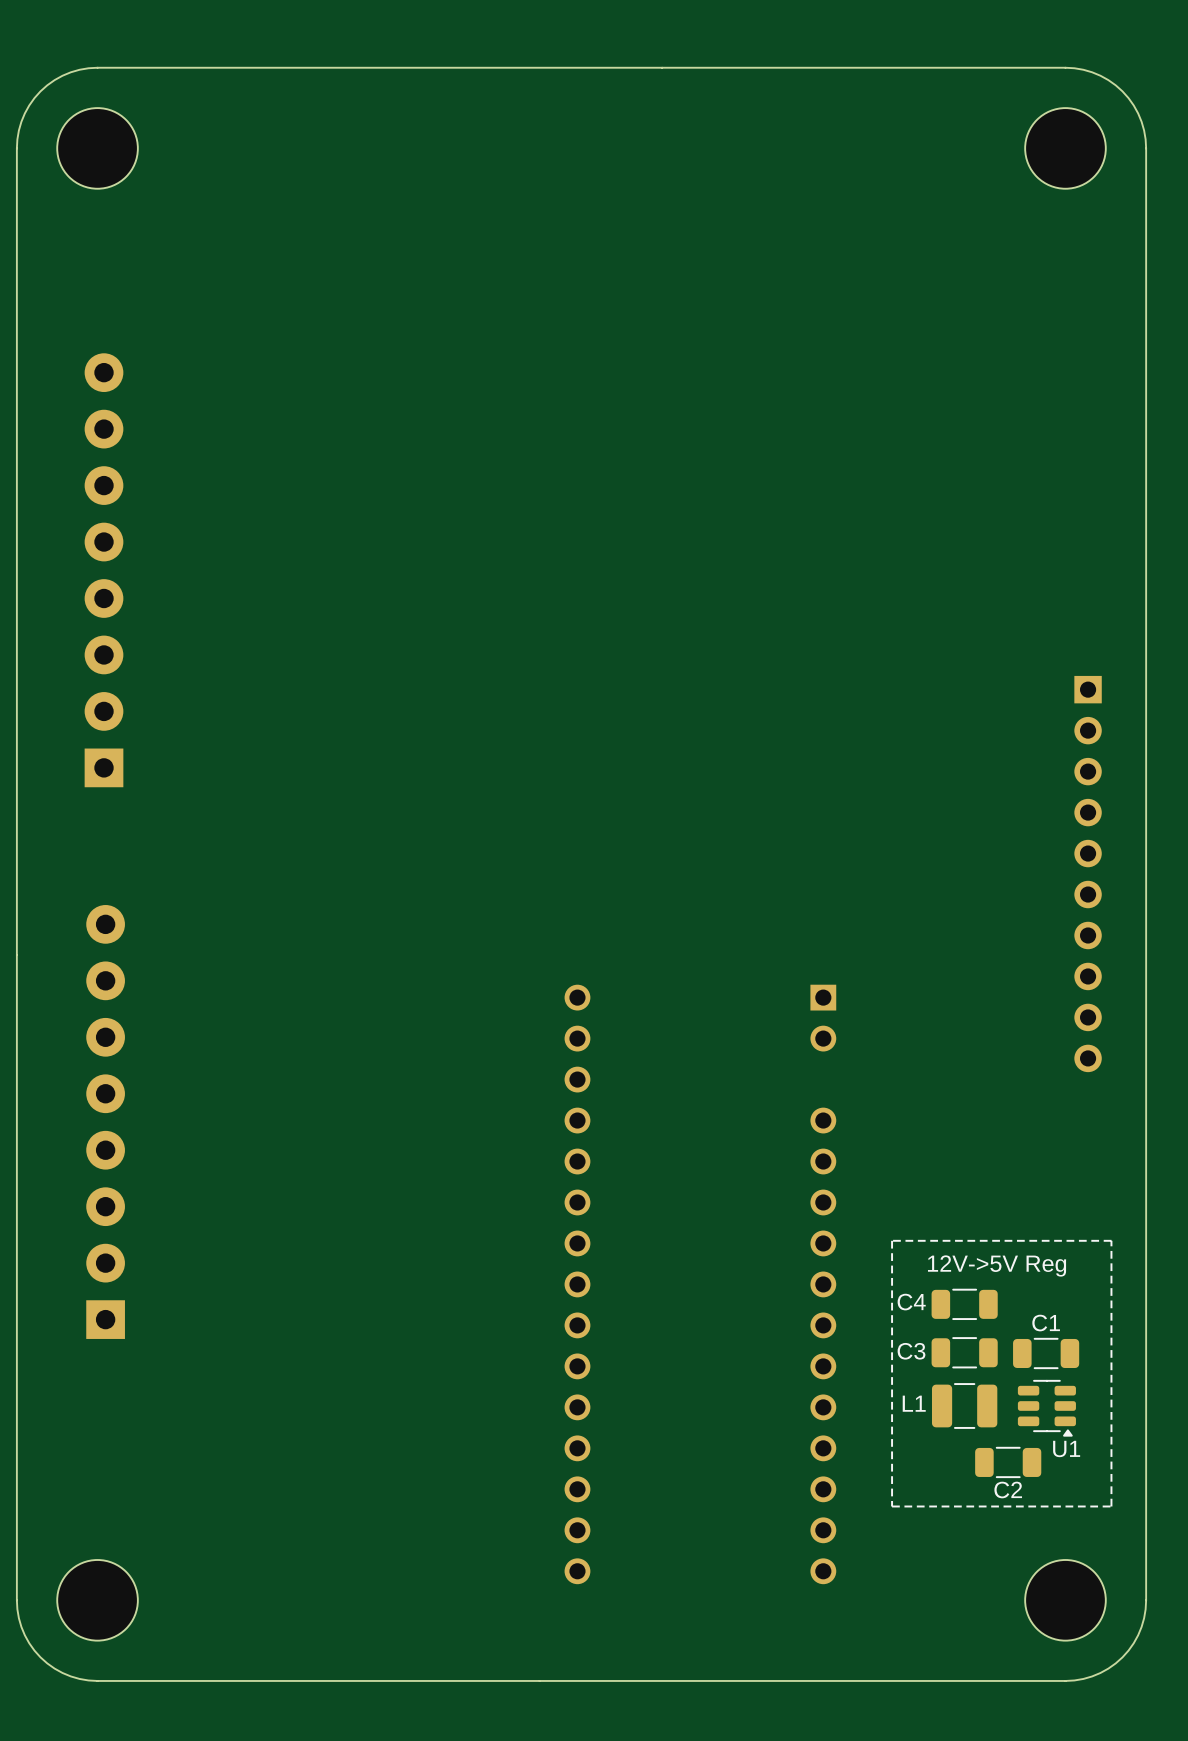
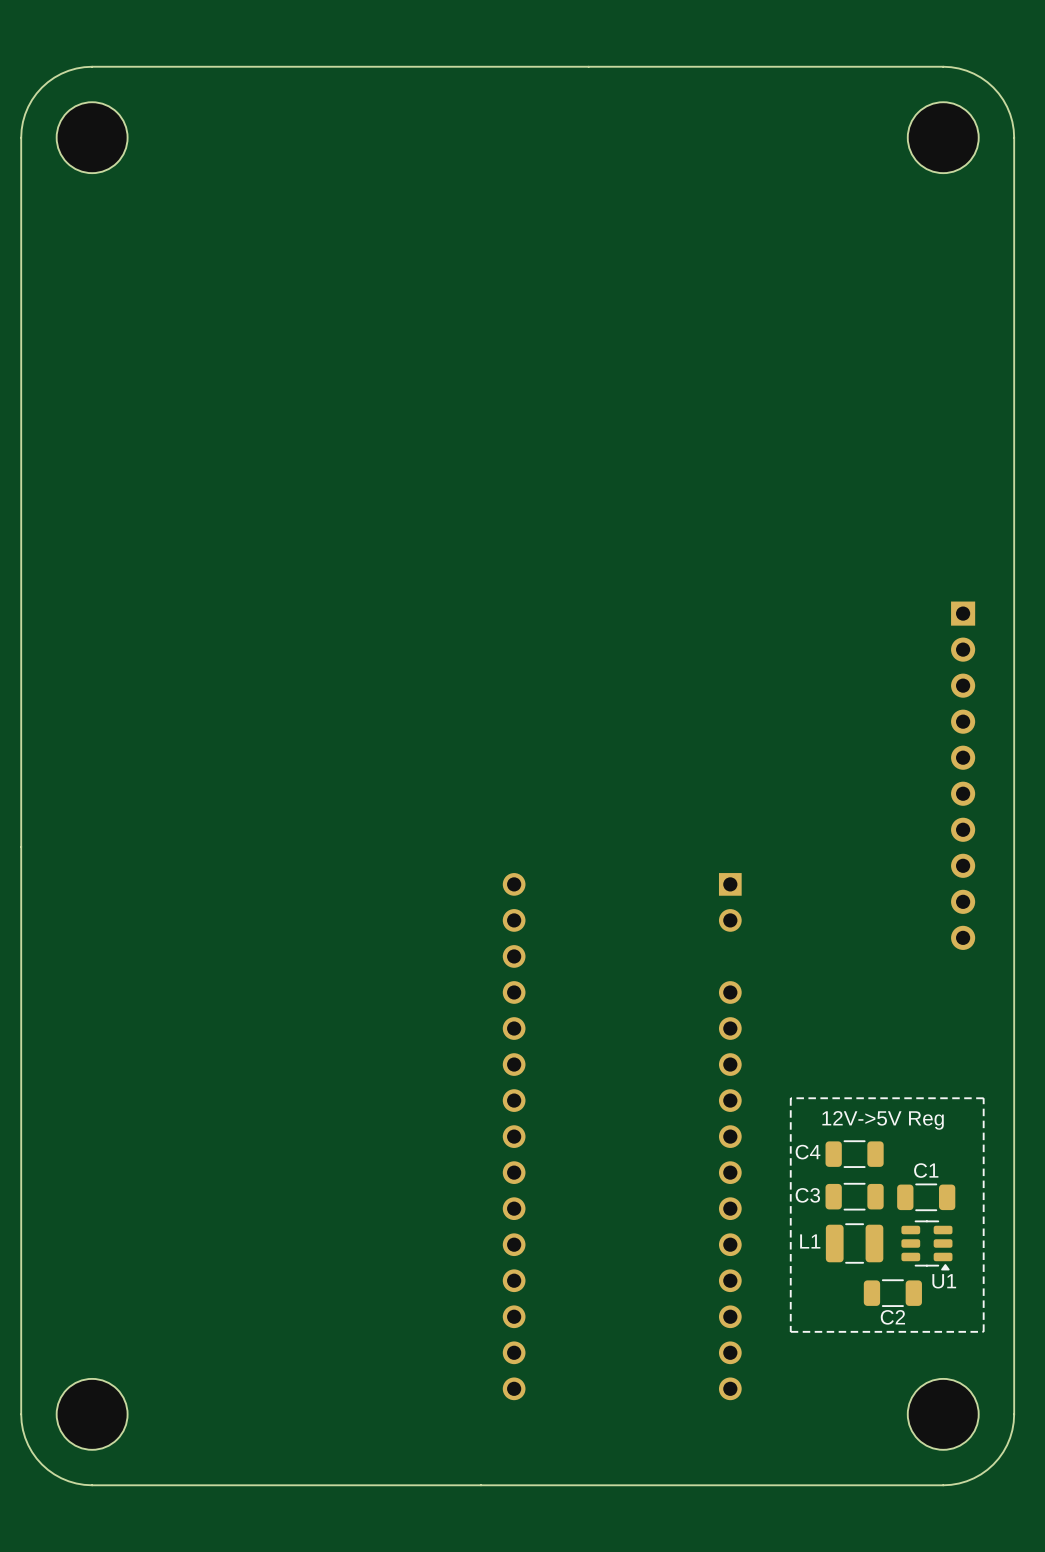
part: (103, 570) -> none
part: (105, 1121) -> none

